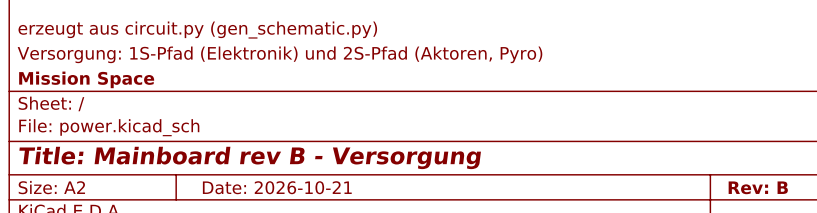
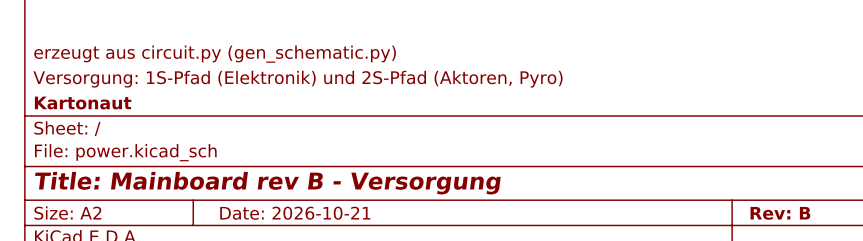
title block: Mission Space (86, 79) -> Kartonaut (83, 103)

